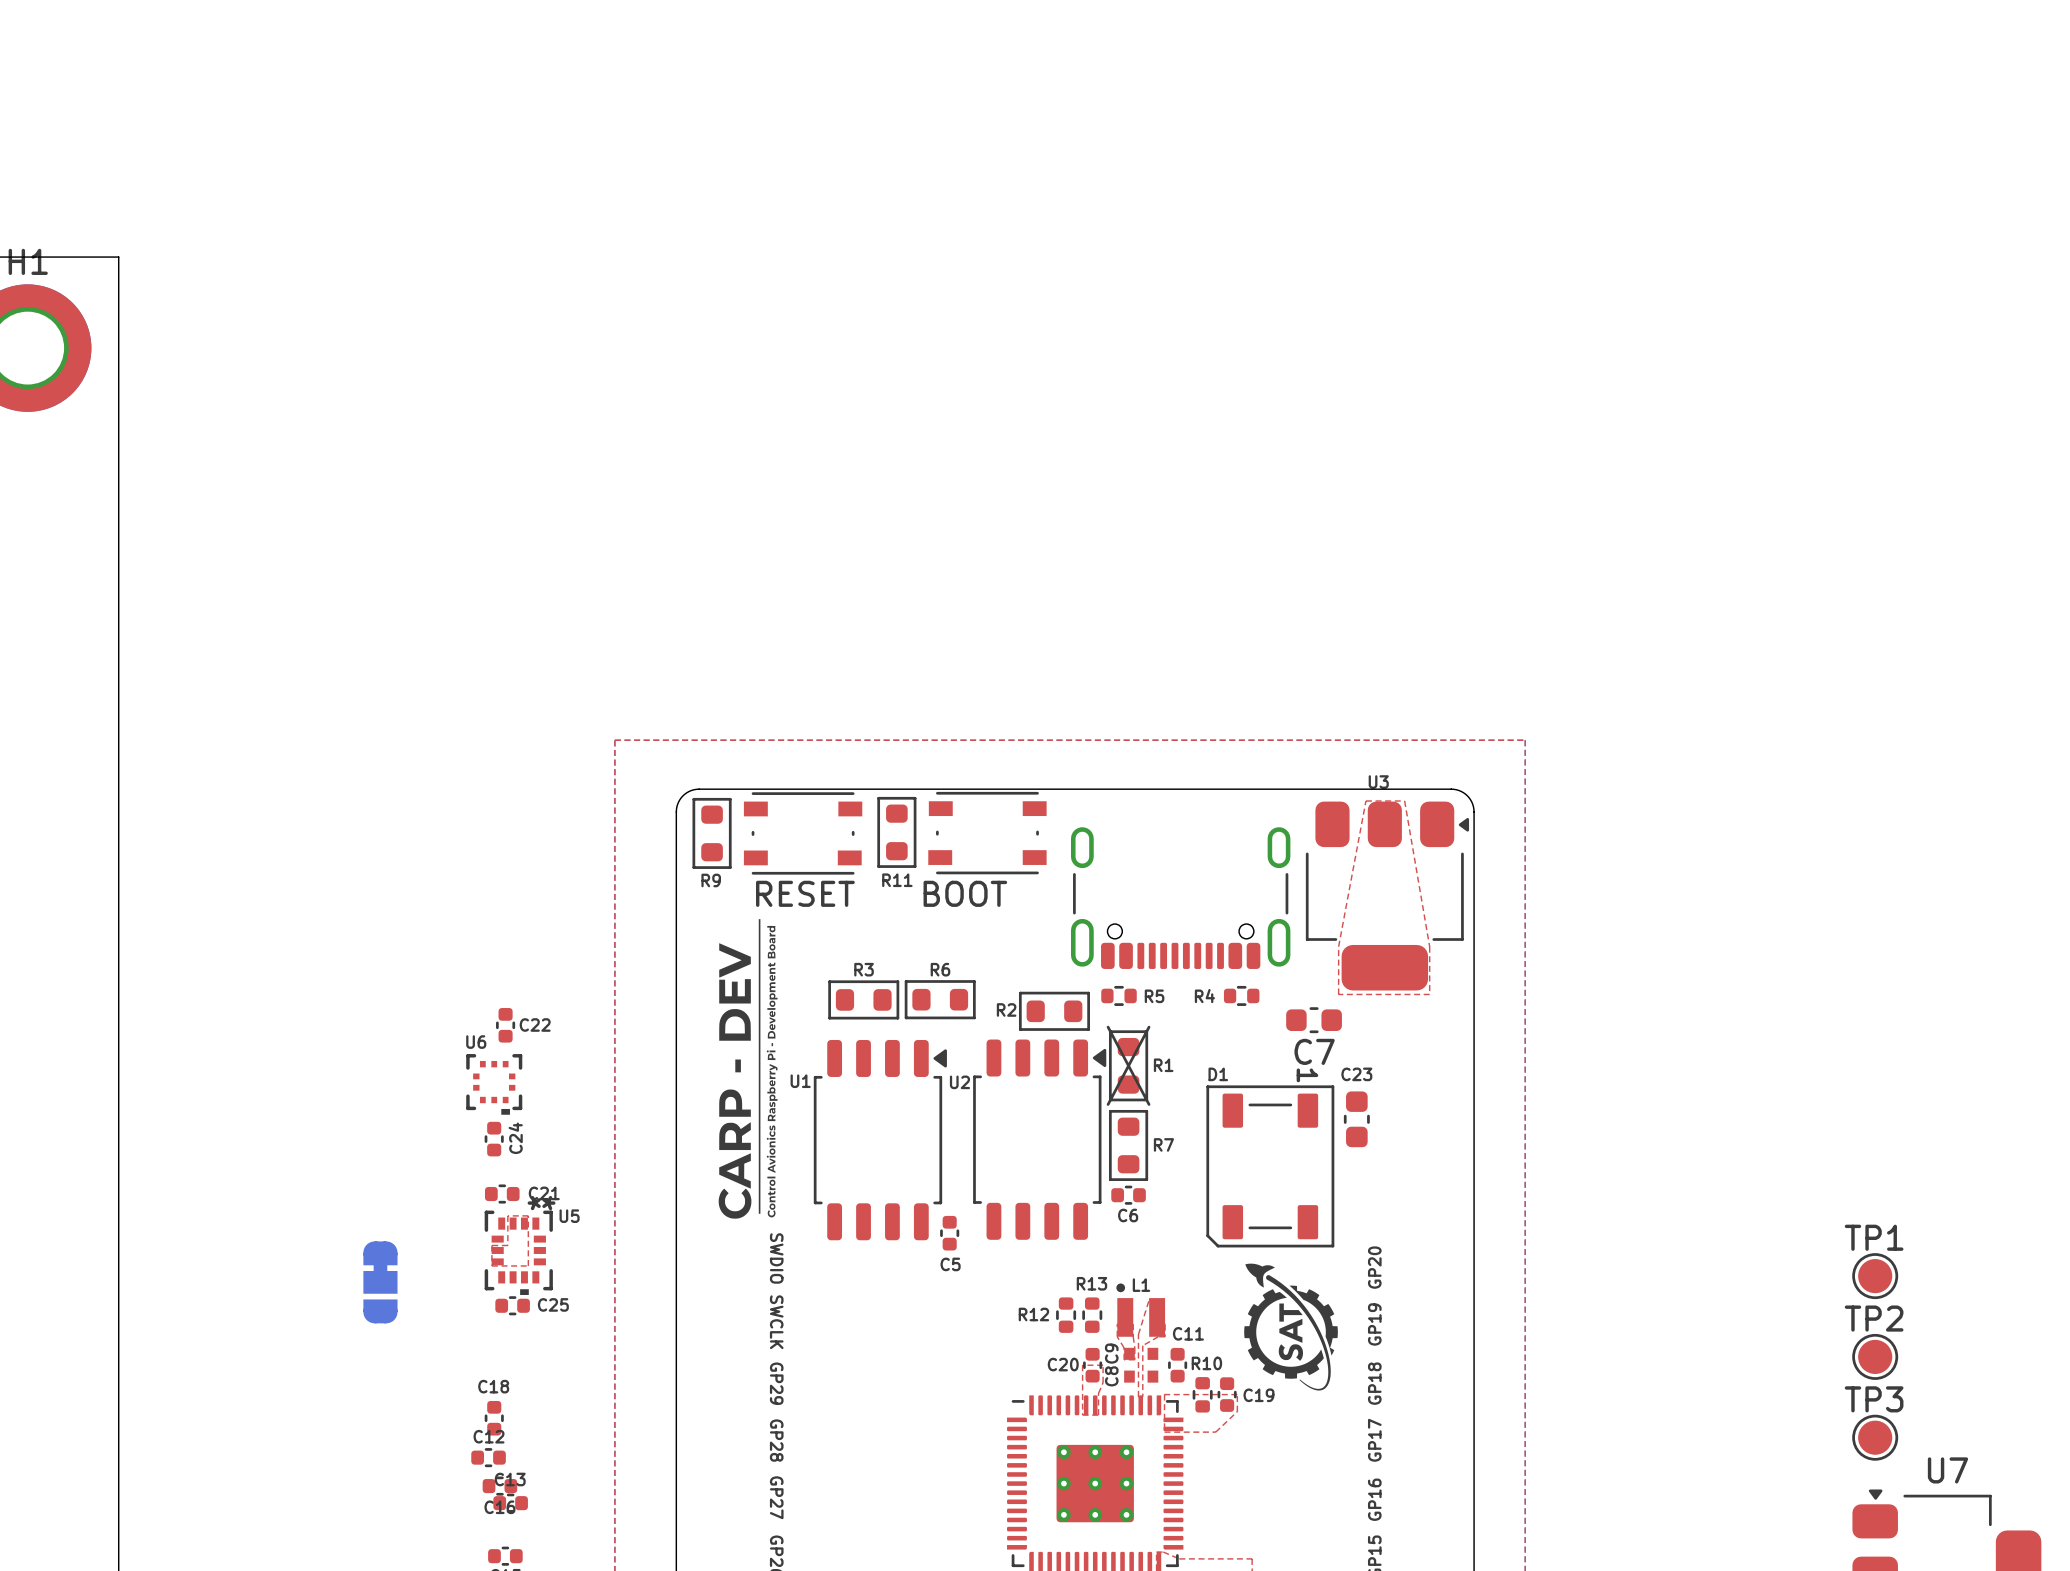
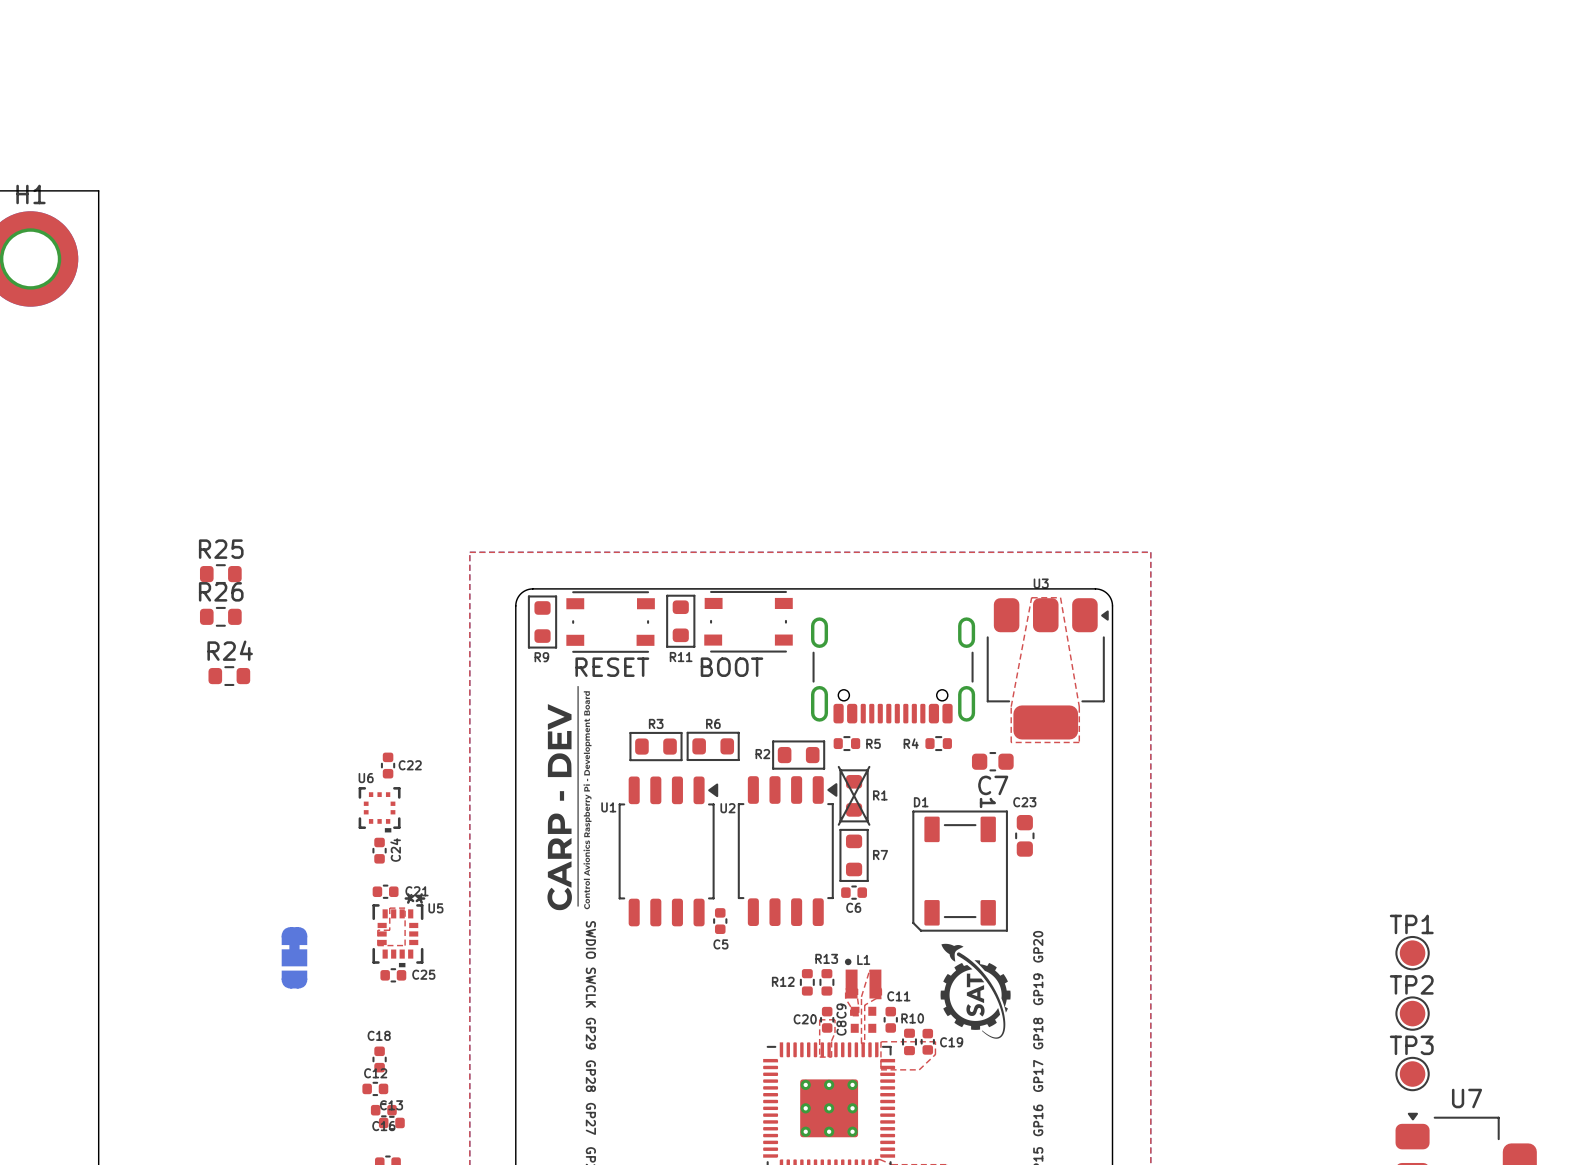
R25: none -> (220, 574)
R26: none -> (220, 616)
R24: none -> (229, 676)

